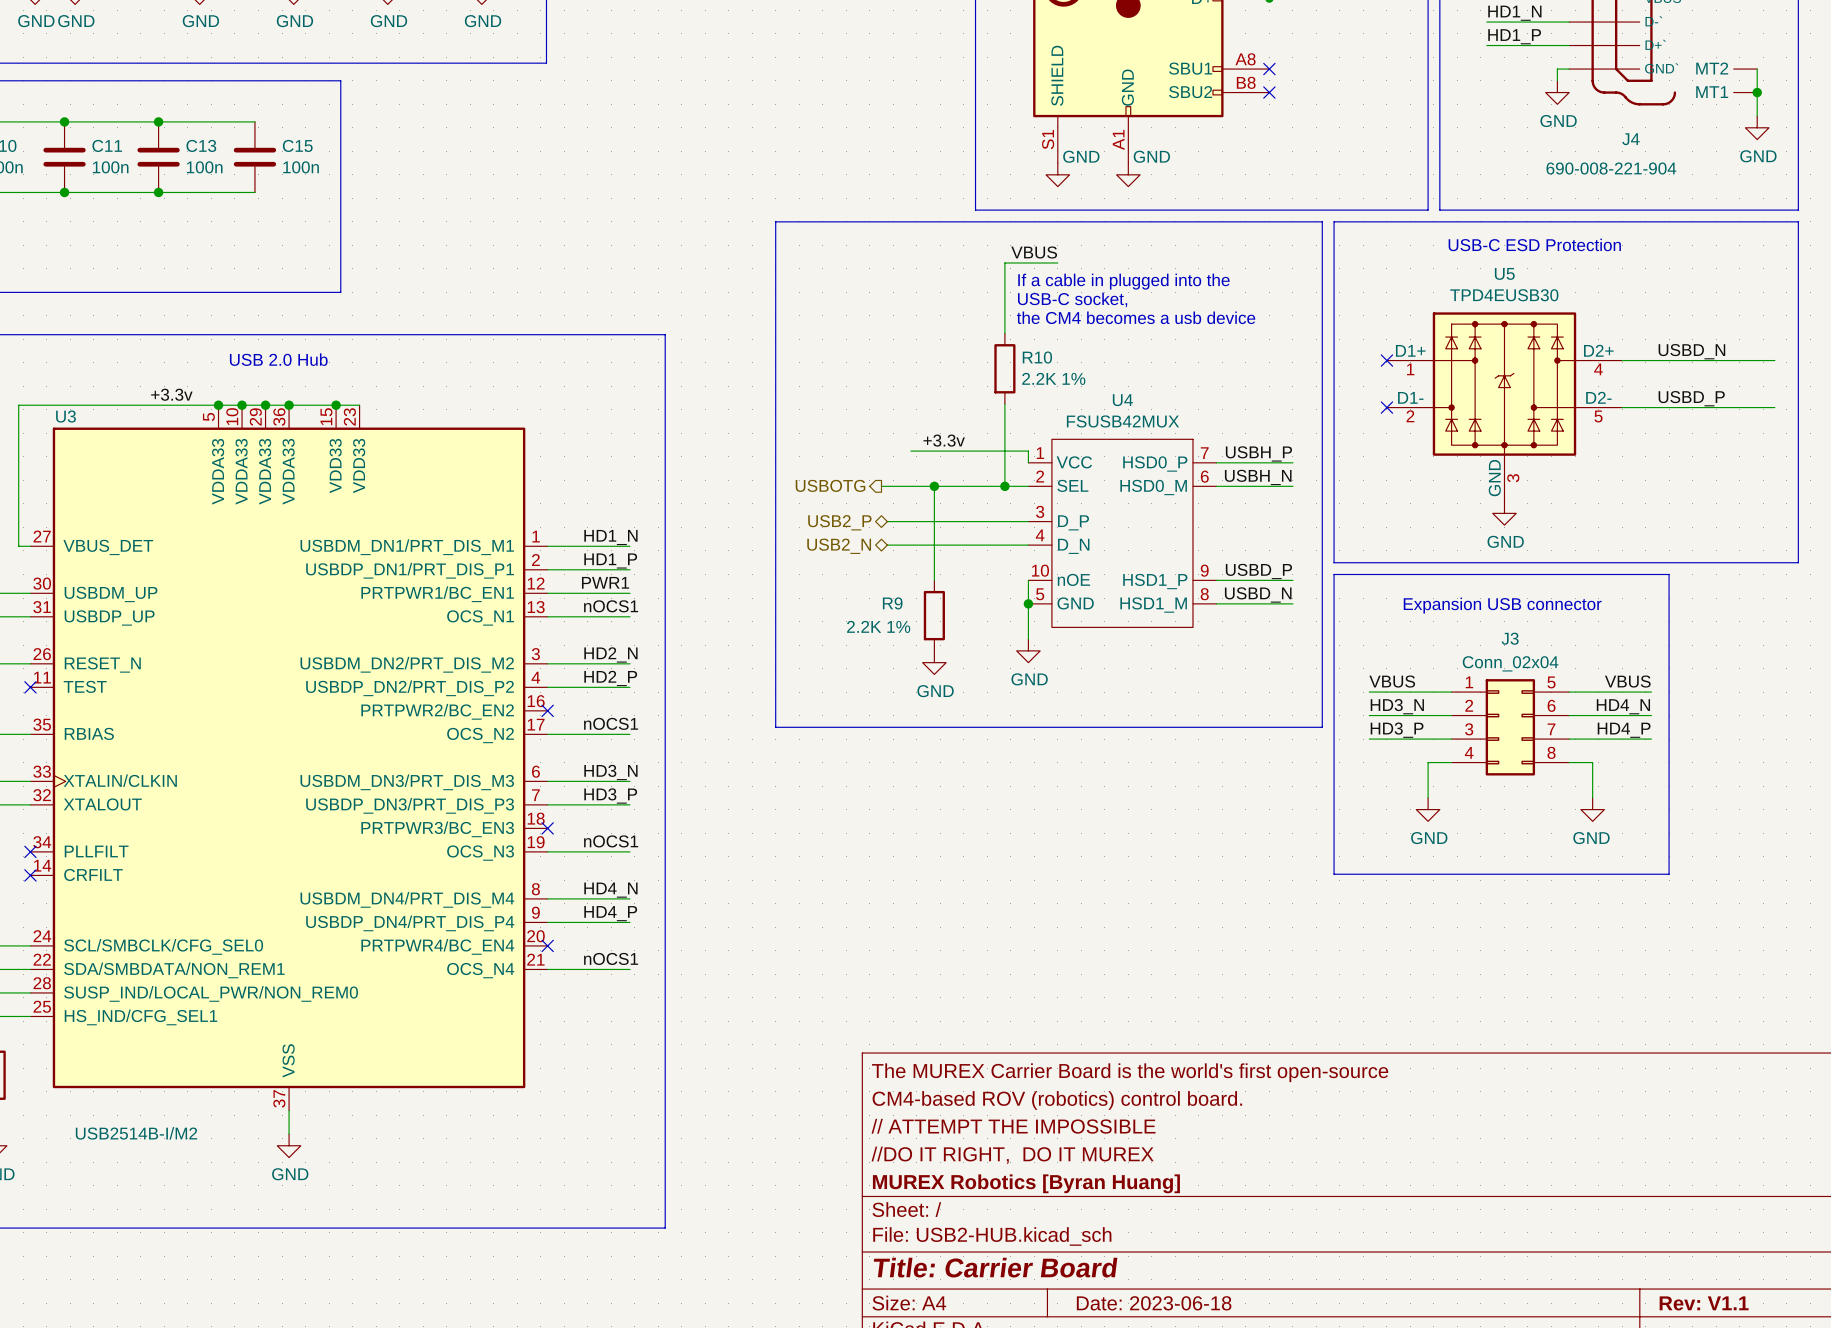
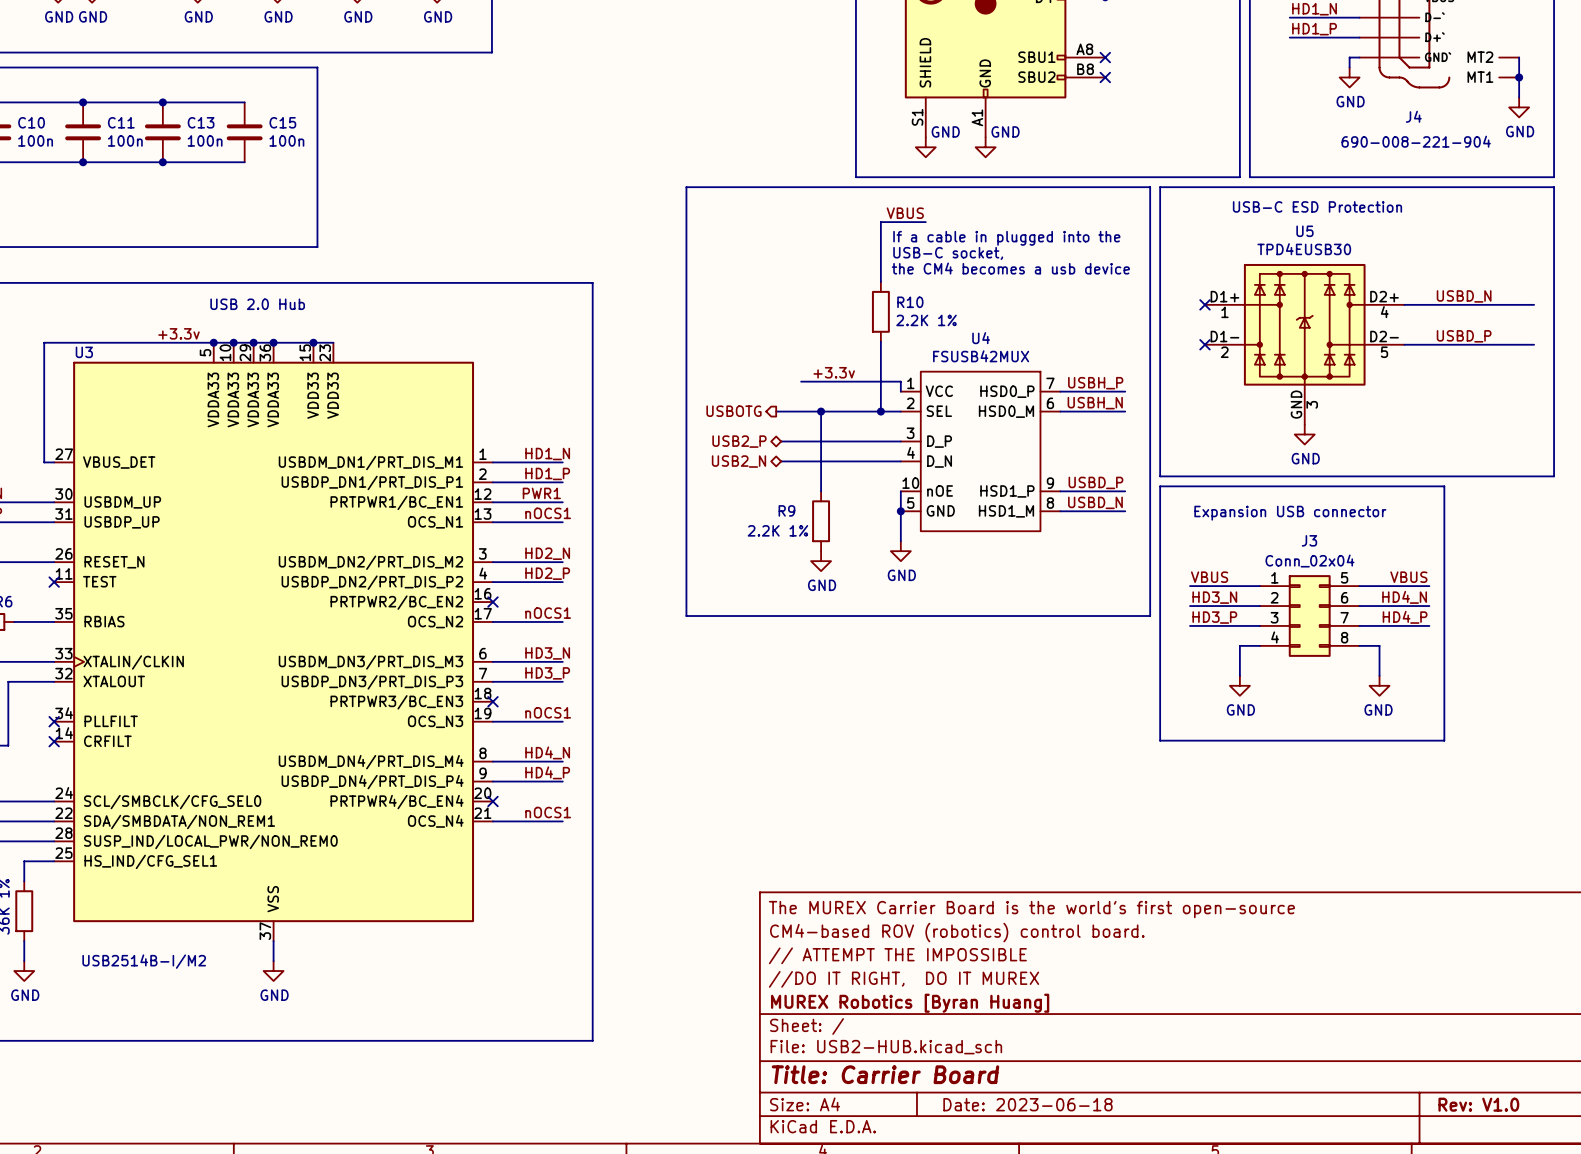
title block: Rev: V1.1 (1704, 1303) -> Rev: V1.0 (1478, 1104)

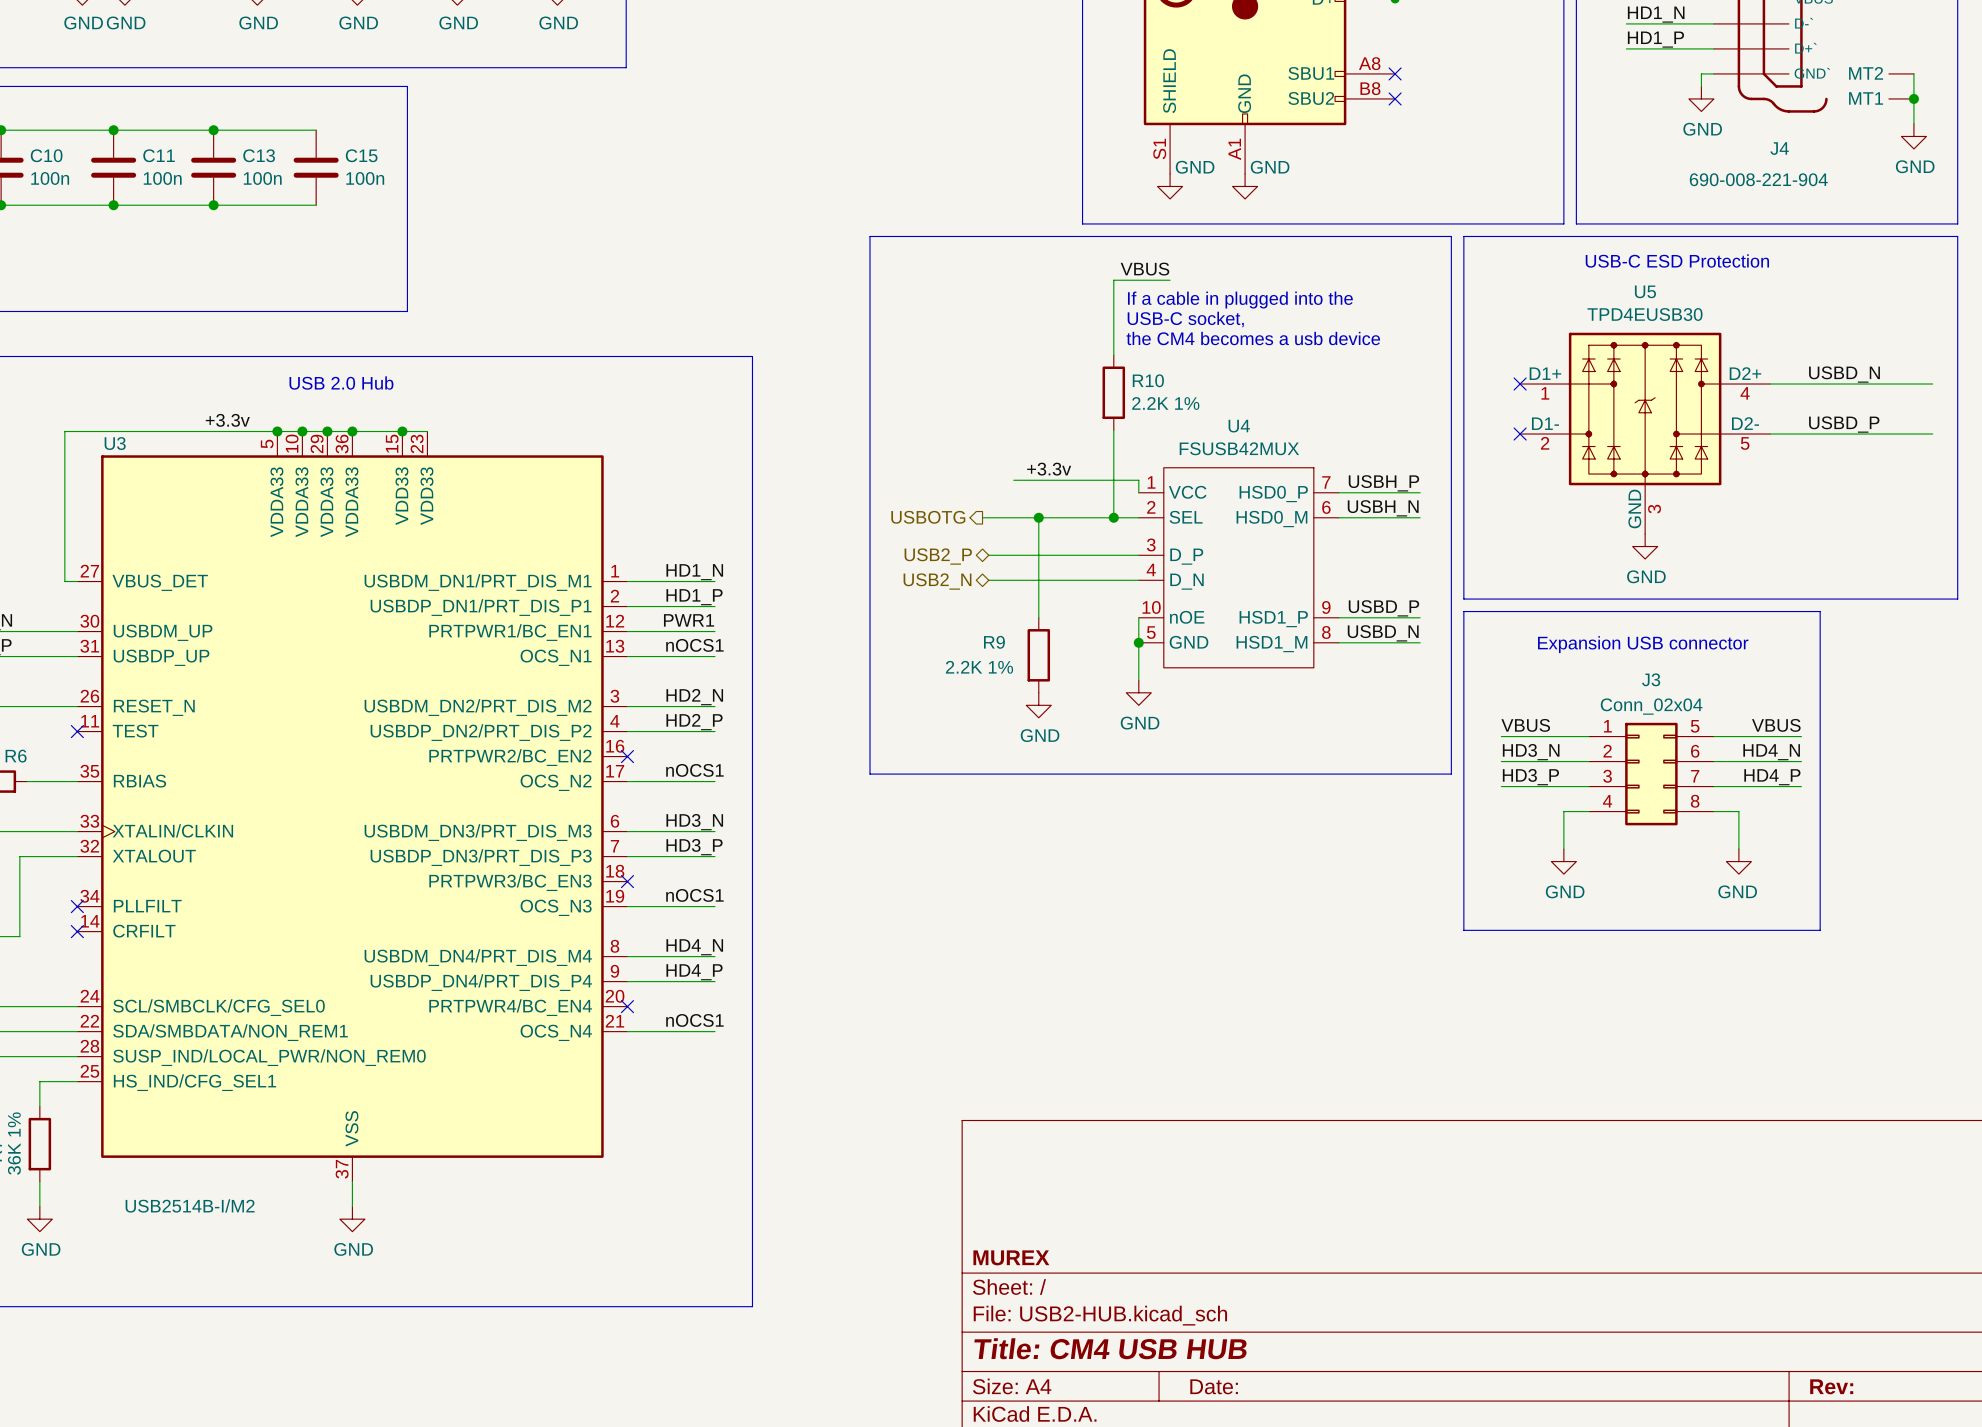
title block: The MUREX Carrier Board is the world's first open-source (1031, 909) -> none
title block: CM4-based ROV (robotics) control board. (957, 932) -> none
title block: // ATTEMPT THE IMPOSSIBLE (897, 955) -> none
title block: //DO IT RIGHT, DO IT MUREX (904, 979) -> none
title block: MUREX Robotics [Byran Huang] (910, 1003) -> MUREX (1011, 1257)
title block: Title: Carrier Board (885, 1074) -> Title: CM4 USB HUB (1110, 1348)
title block: Date: 2023-06-18 (1027, 1104) -> Date: (1214, 1386)
title block: Rev: V1.0 (1478, 1104) -> Rev: (1831, 1386)

